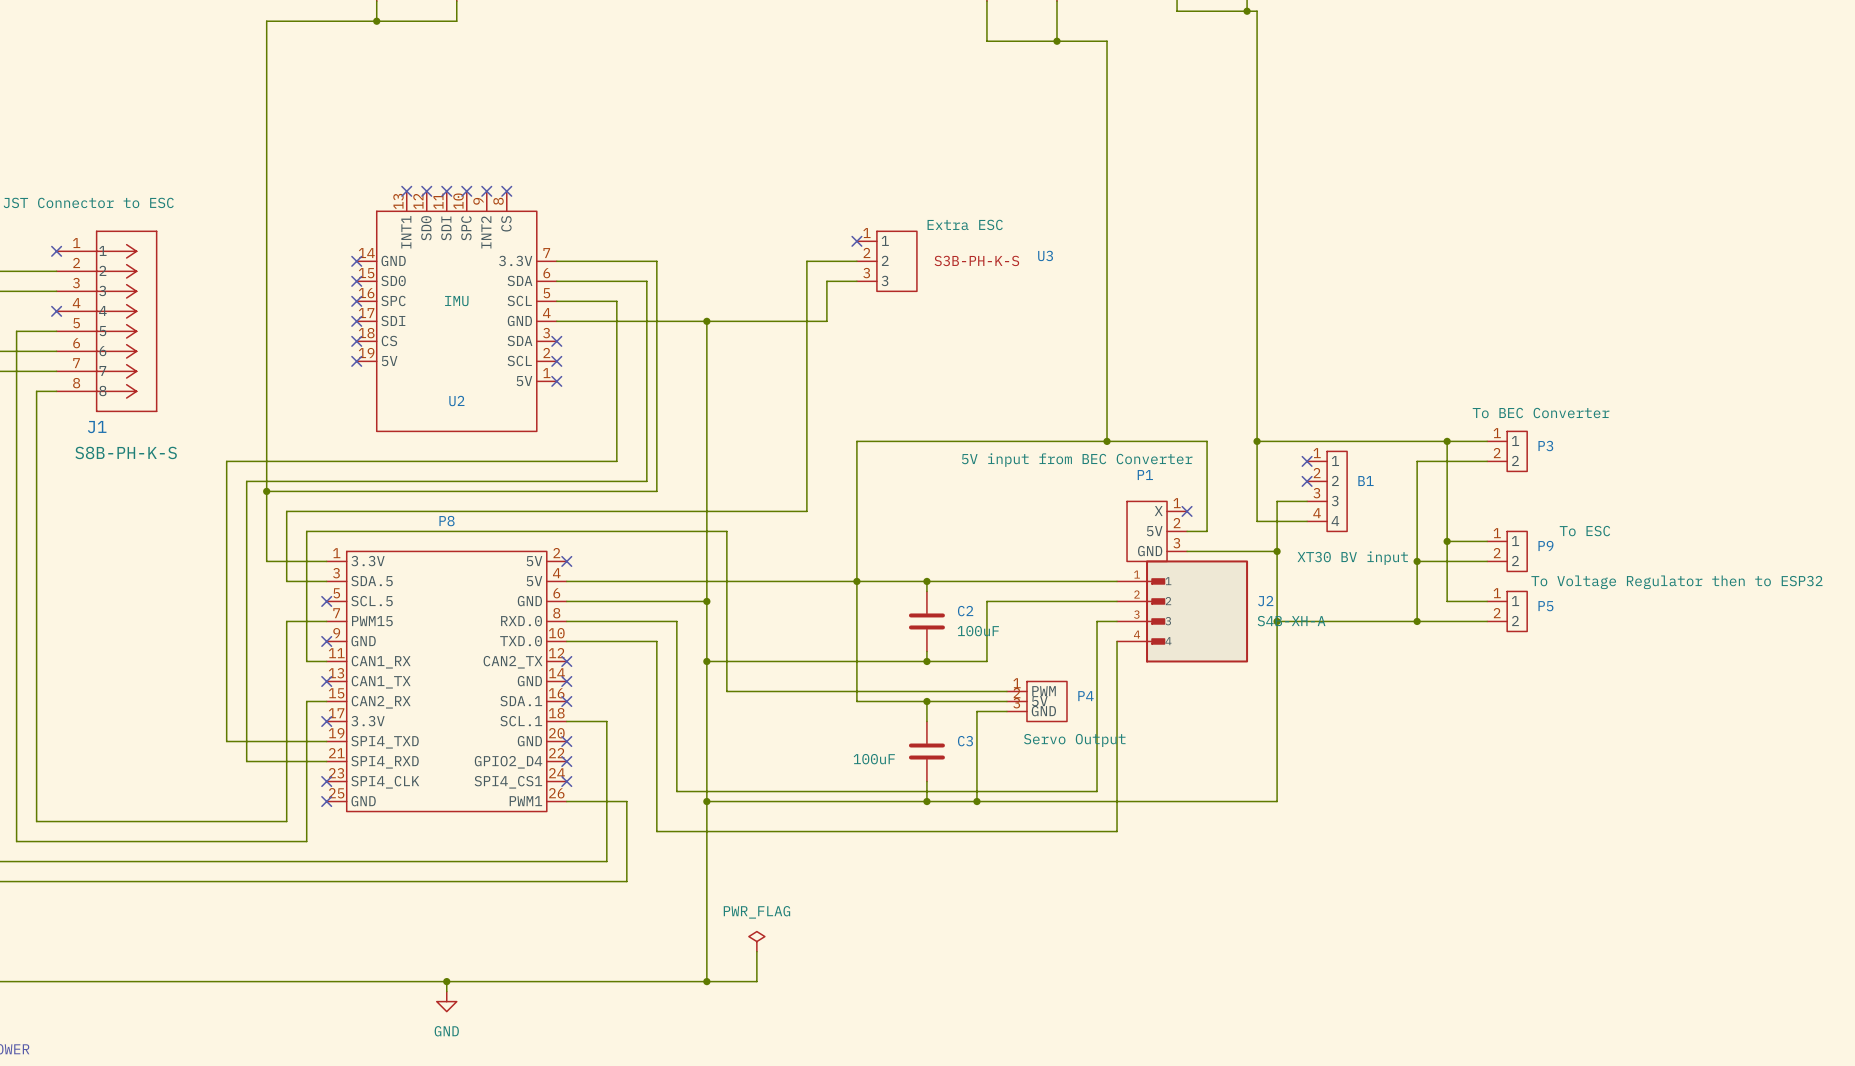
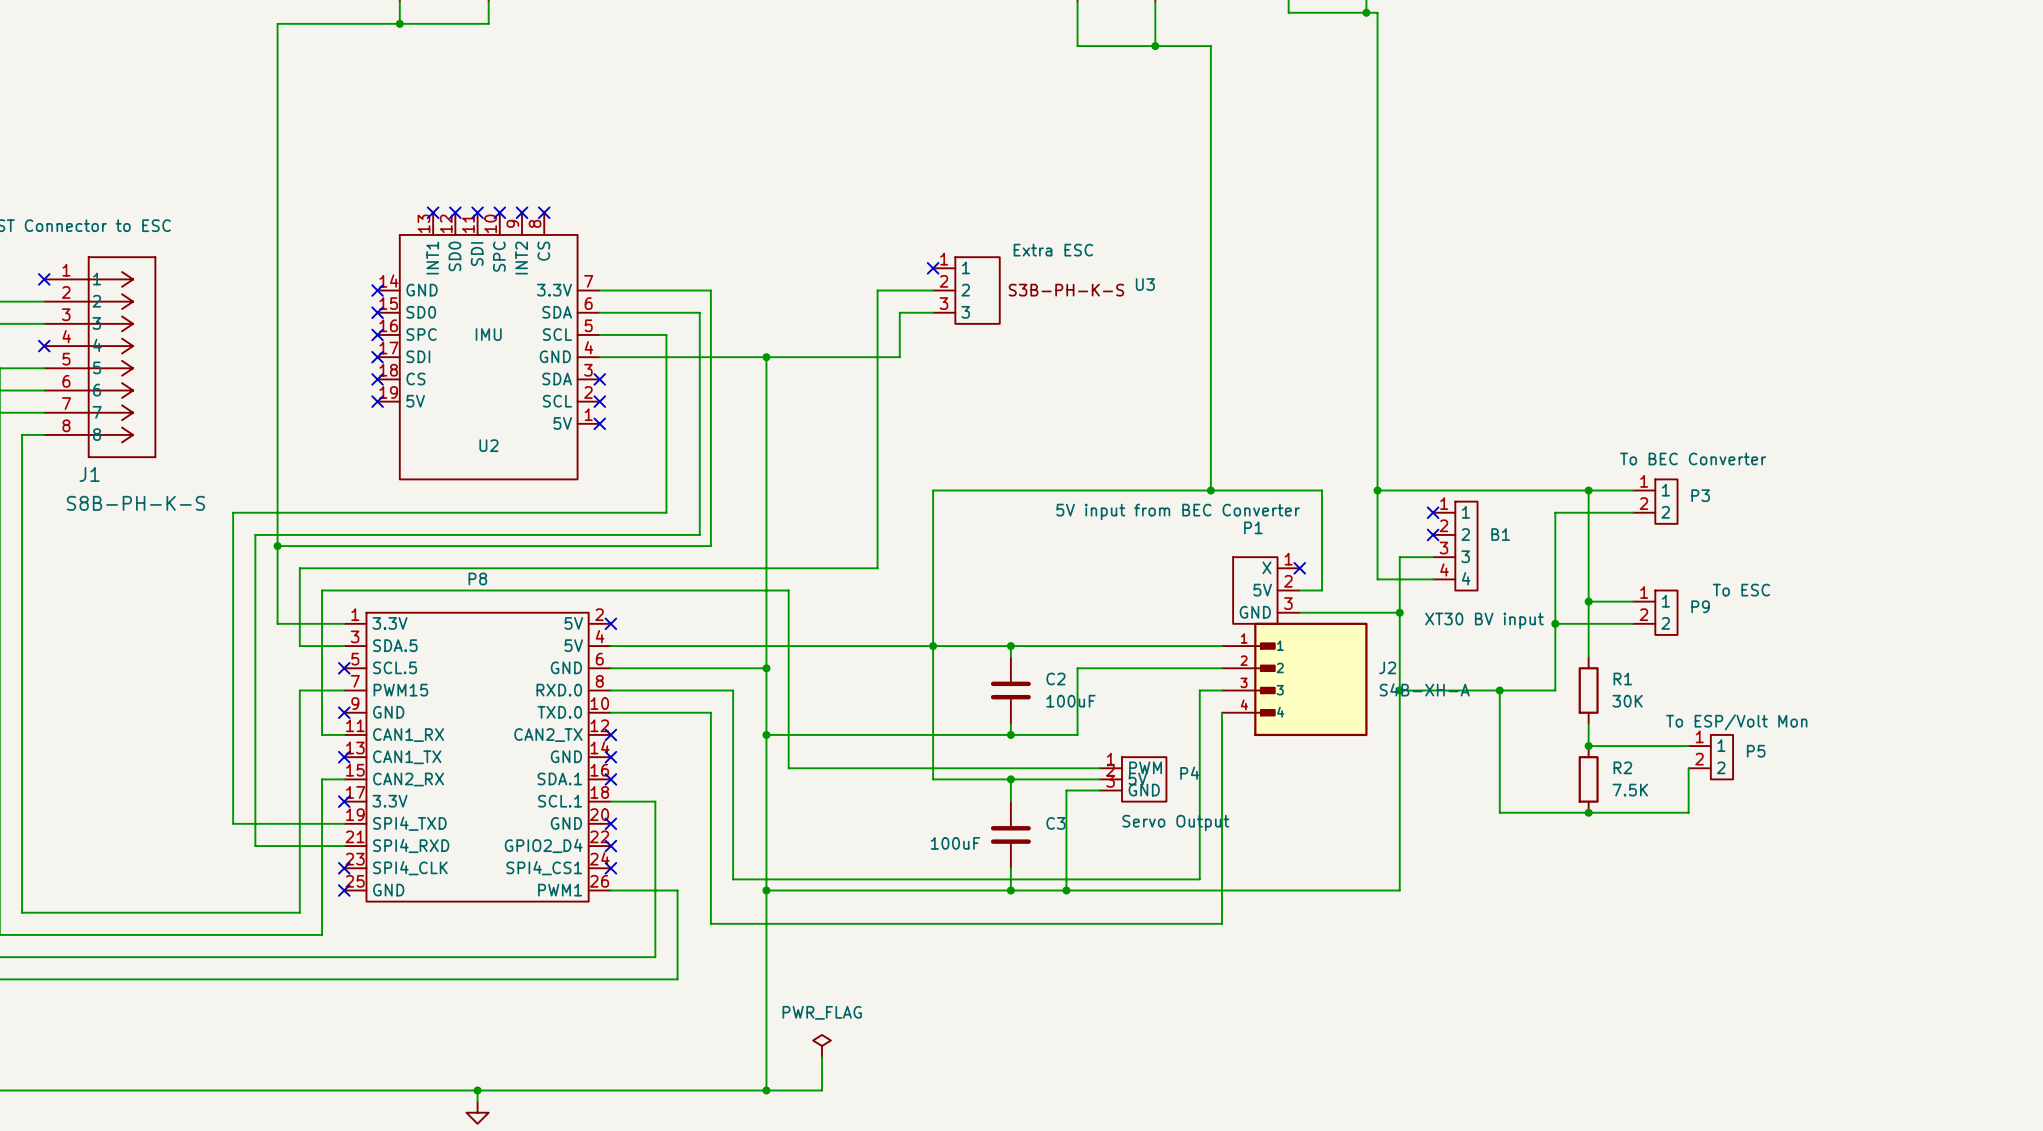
P5 text: To Voltage Regulator then to ESP32 (1676, 582) -> To ESP/Volt Mon (1736, 722)
wire: (1447, 591) (1447, 601) (1487, 601) -> none
P5 position: (1507, 611) -> (1710, 757)
wire: none -> (1499, 690) (1499, 812) (1688, 812) (1688, 768)
junction: none -> (1499, 690)
wire: (1417, 621) (1487, 621) -> none
junction: (1417, 621) -> none
R1: none -> 30K (1588, 690)
wire: none -> (1588, 723) (1588, 746) (1688, 746)
junction: none -> (1588, 746)
R2: none -> 7.5K (1588, 779)
junction: none -> (1588, 812)

